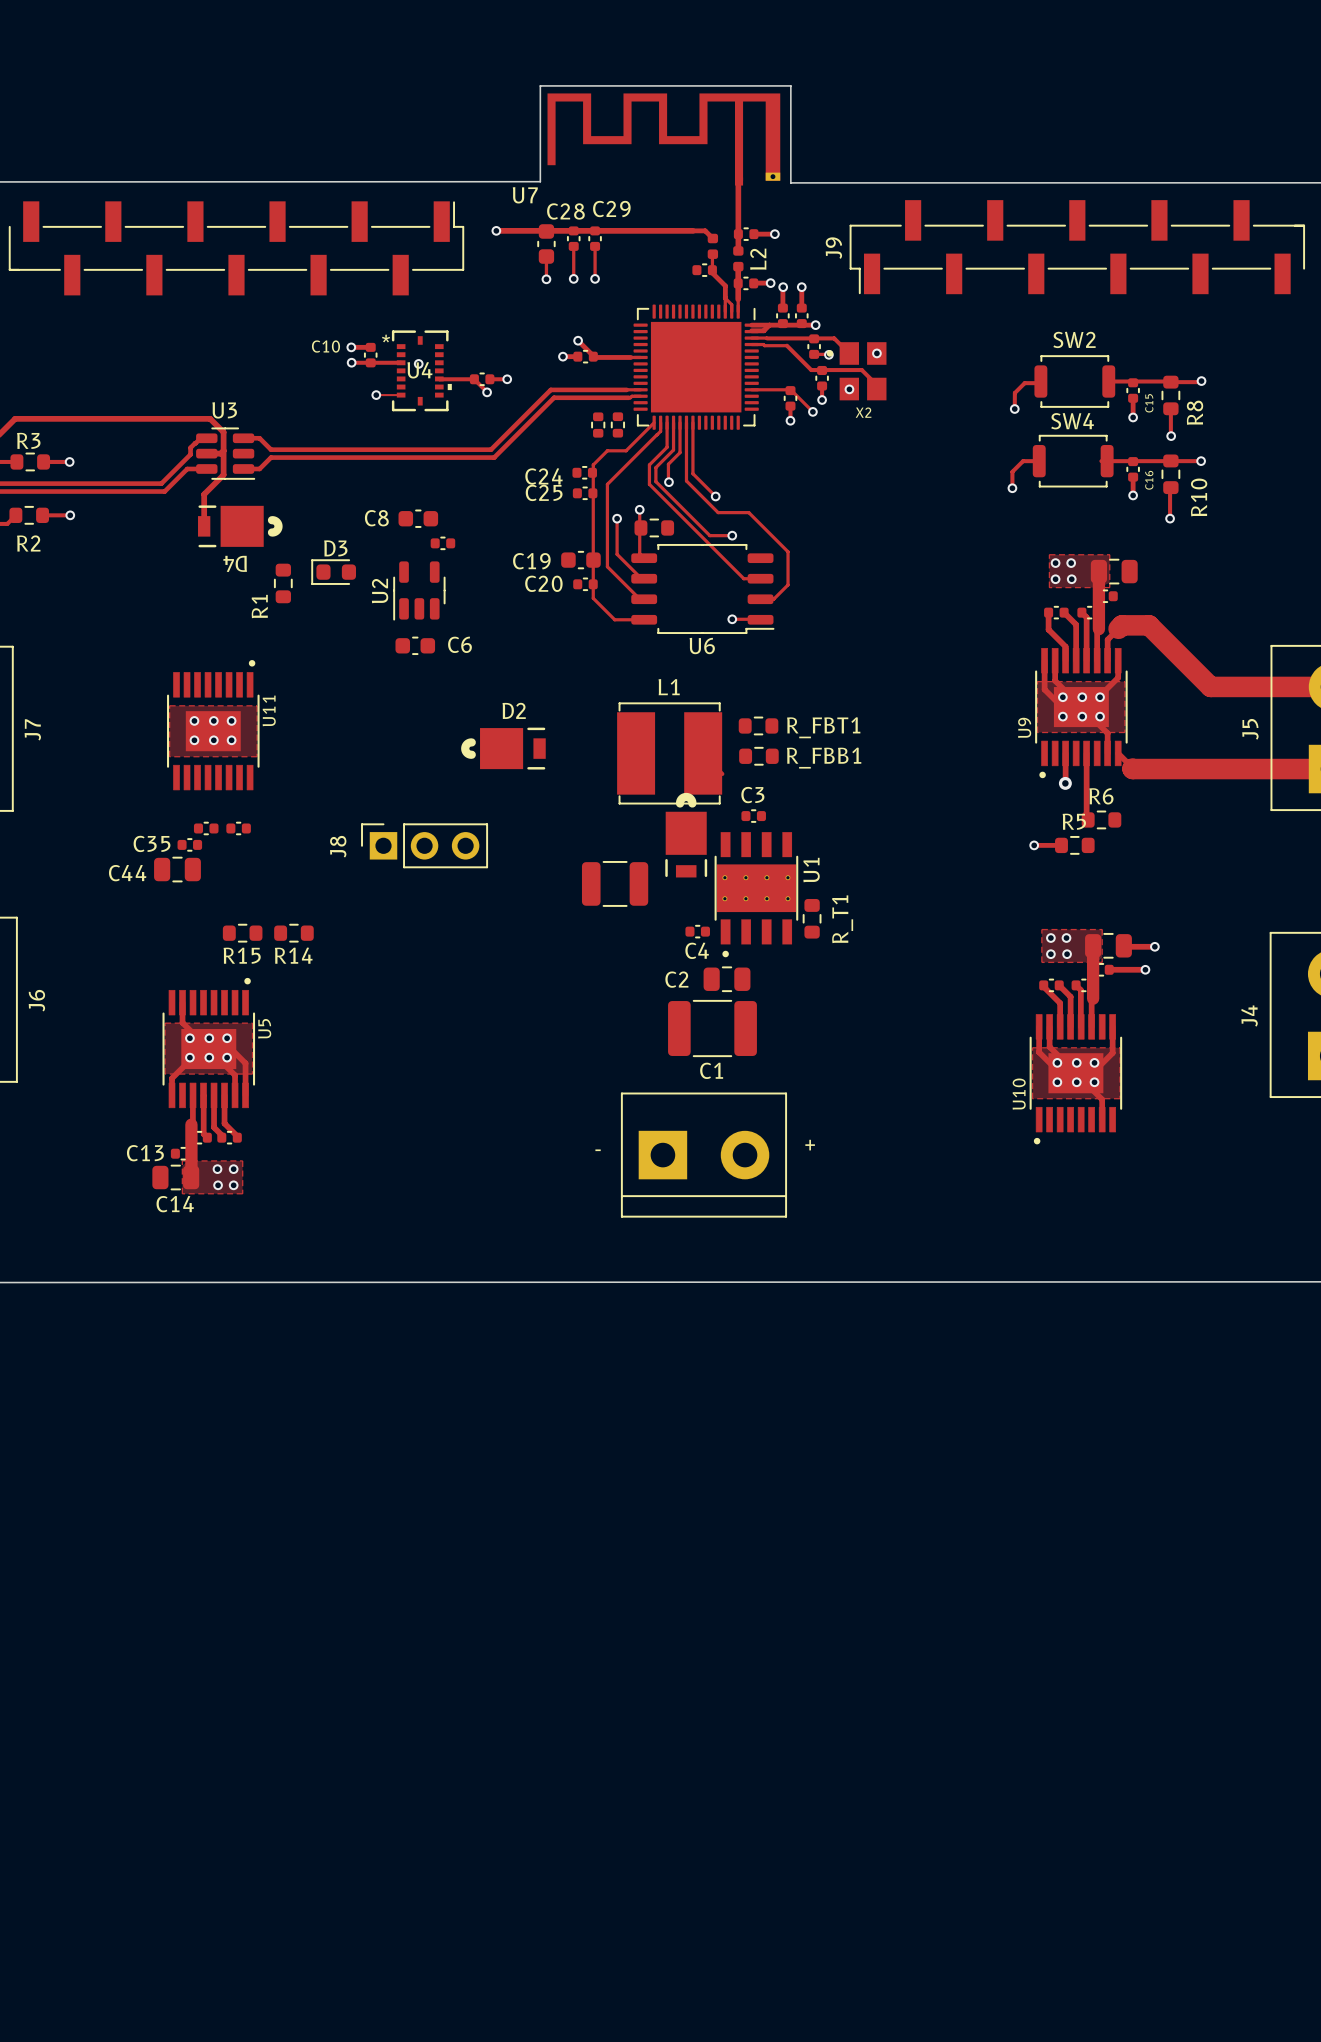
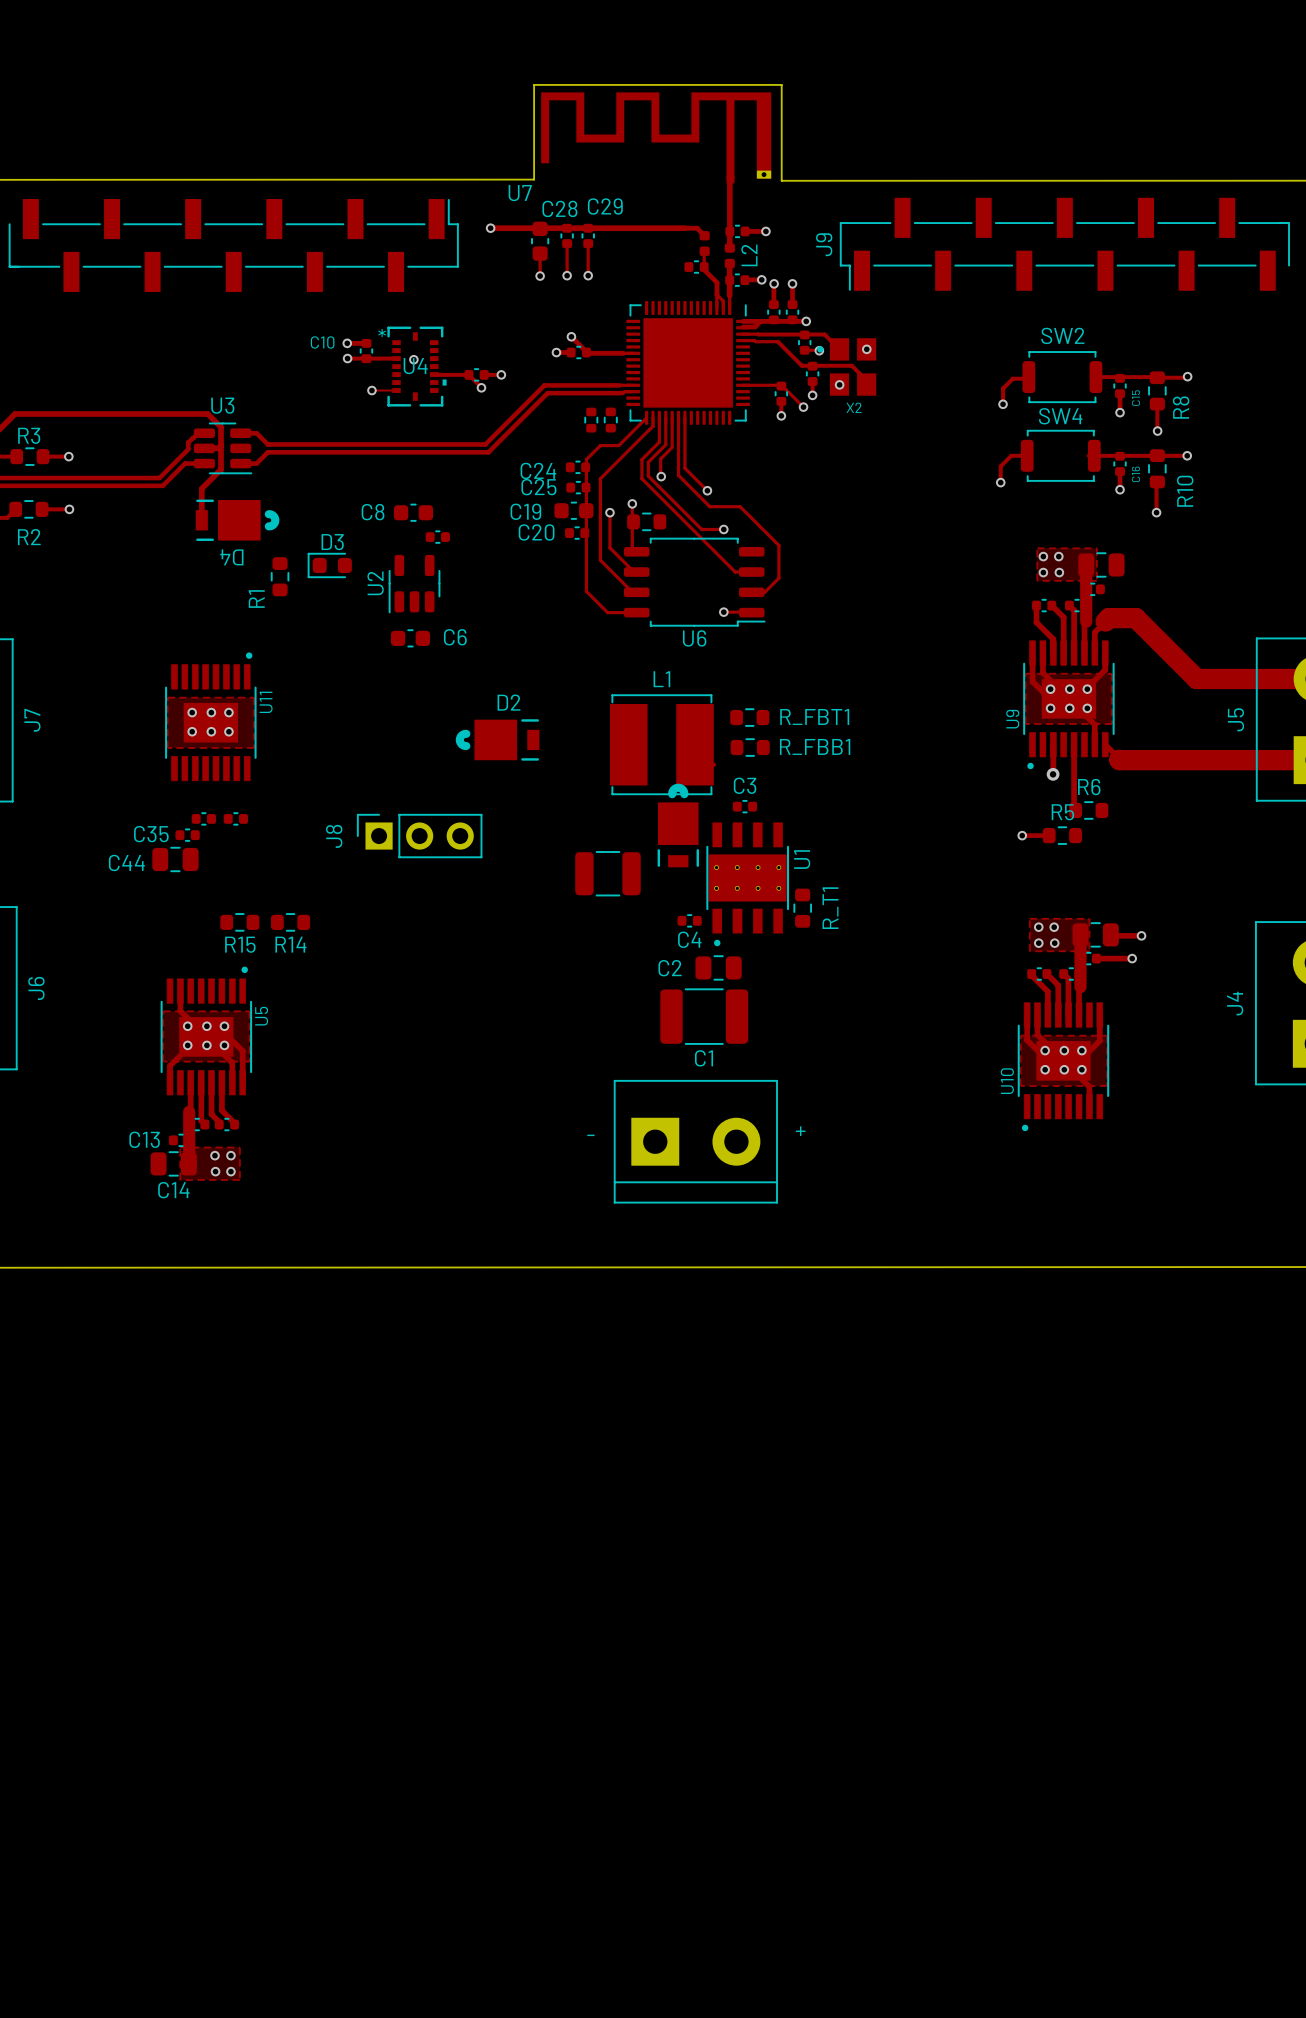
C19 position: (580, 560) -> (573, 510)
C20 position: (585, 584) -> (577, 533)

